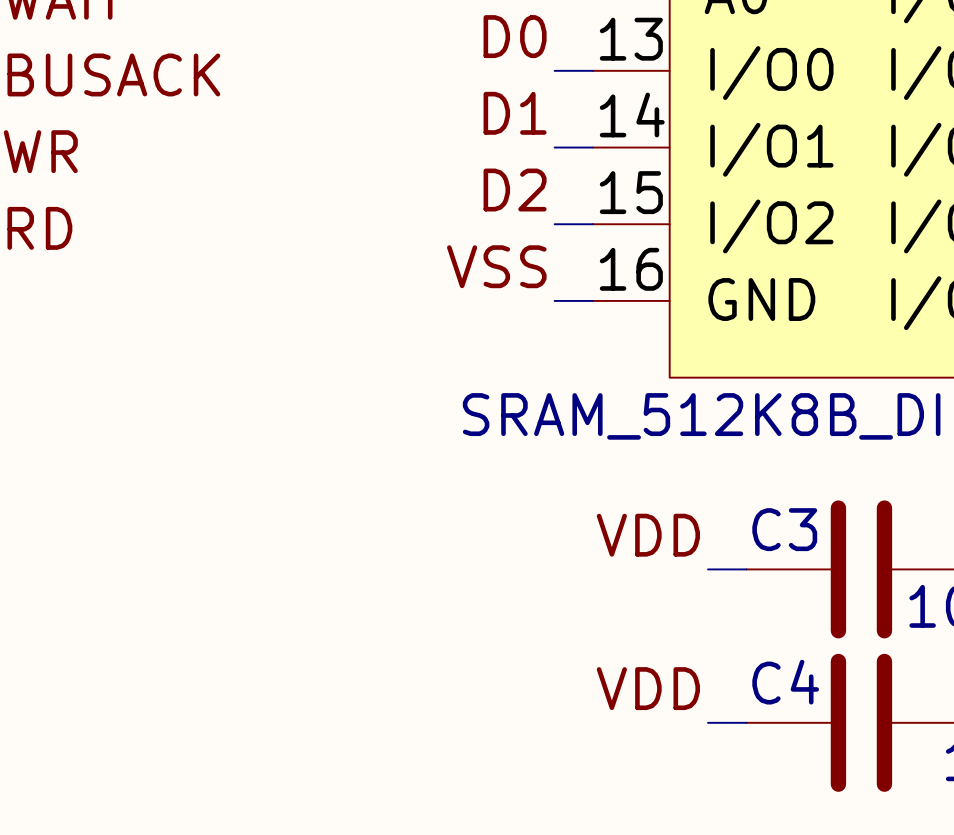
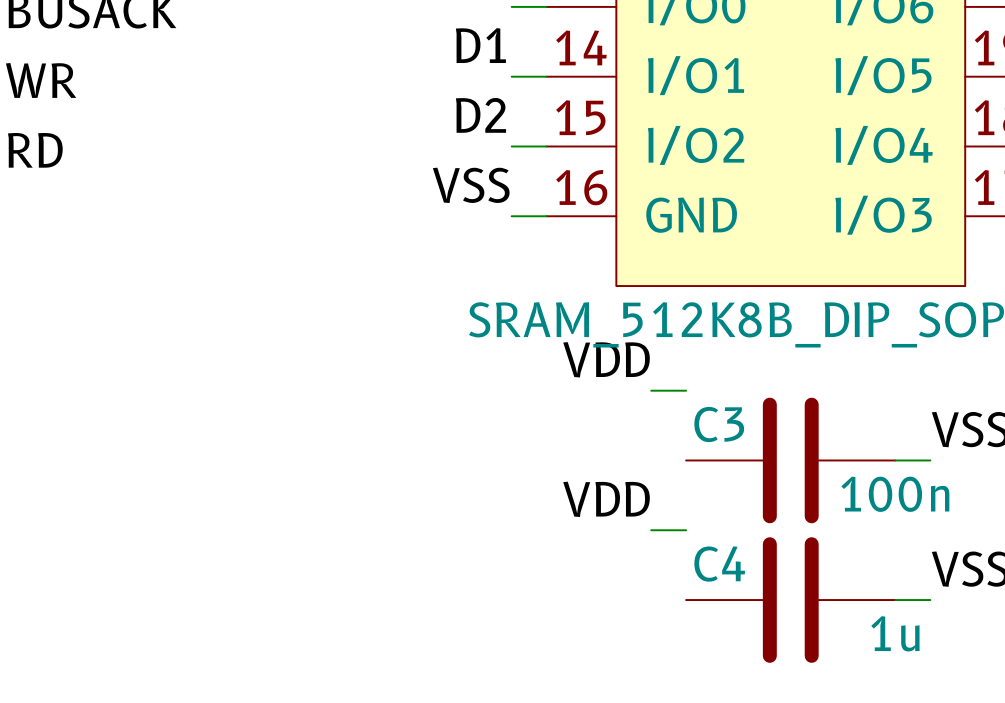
label: none -> VDD (606, 359)
label: VDD (648, 535) -> none
wire: (708, 569) (746, 569) -> (651, 390) (686, 390)
label: none -> VDD (606, 499)
label: VDD (648, 688) -> none
wire: (708, 722) (746, 722) -> (651, 530) (686, 530)

